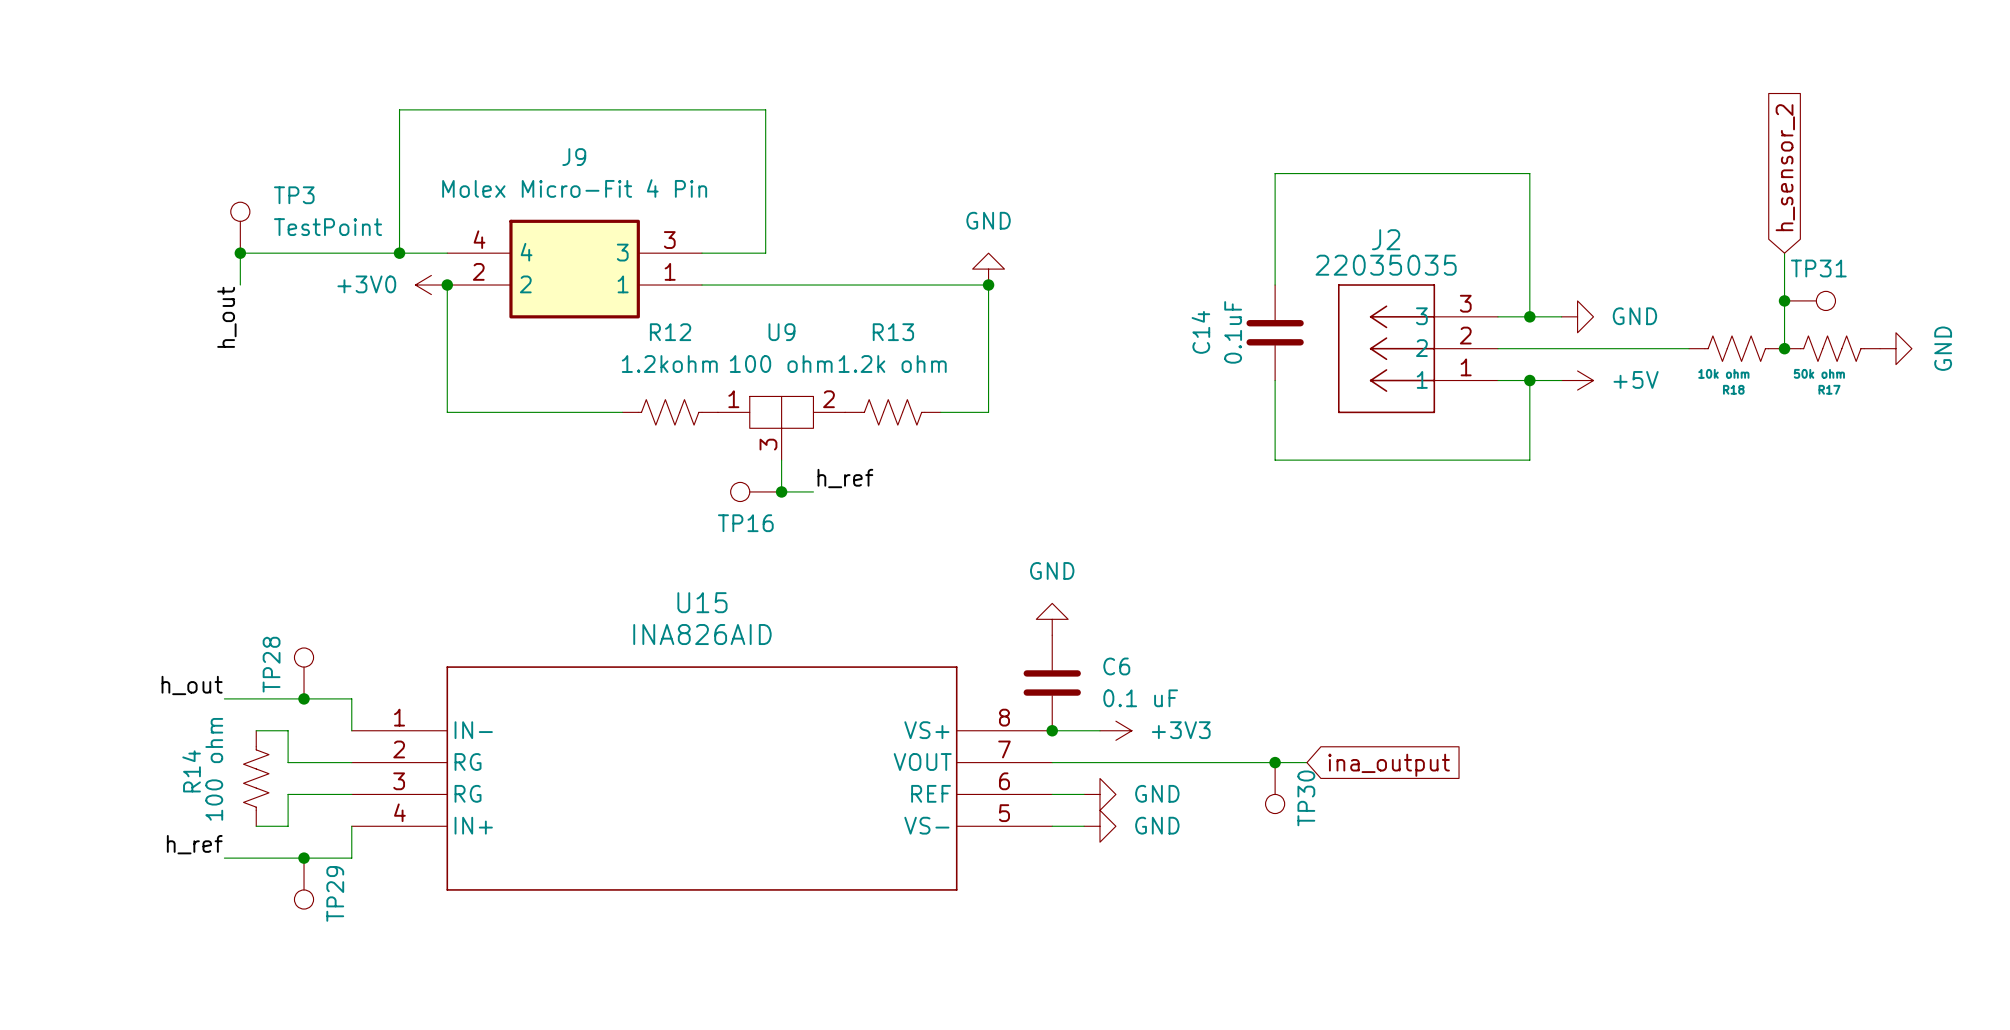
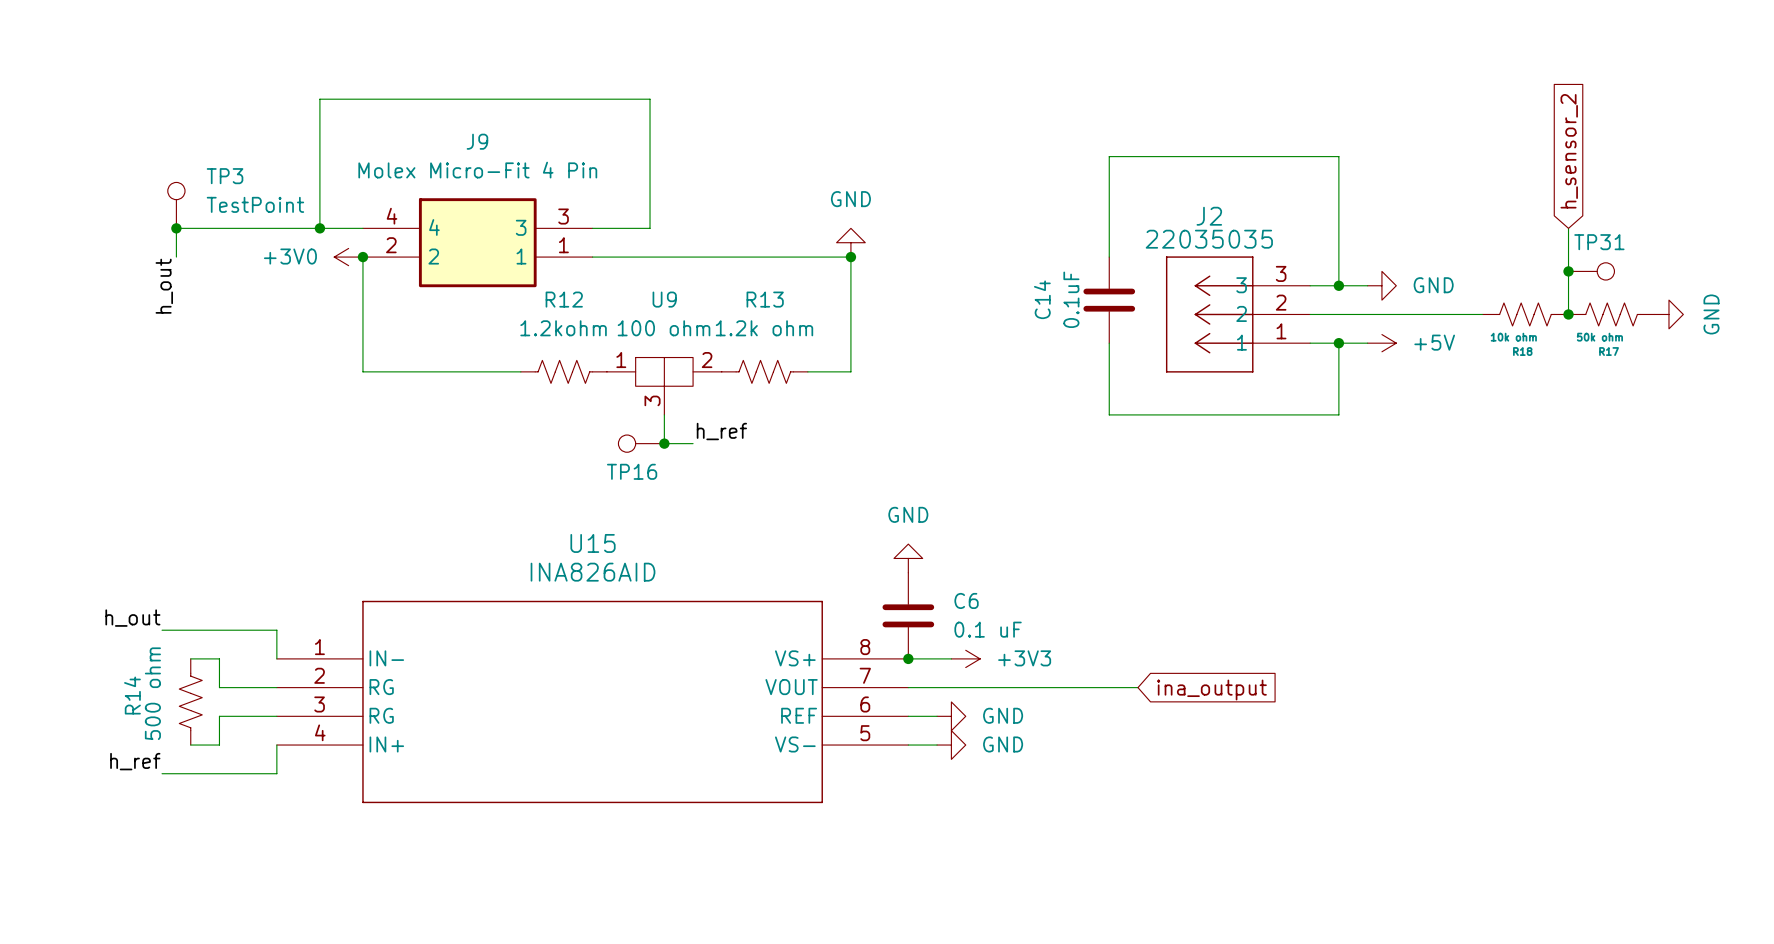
TP28: (304, 673) -> none
junction: (304, 698) -> none
junction: (1275, 762) -> none
R14 value: 100 ohm (214, 769) -> 500 ohm (152, 693)
TP30: (1275, 788) -> none
junction: (304, 858) -> none
TP29: (304, 883) -> none

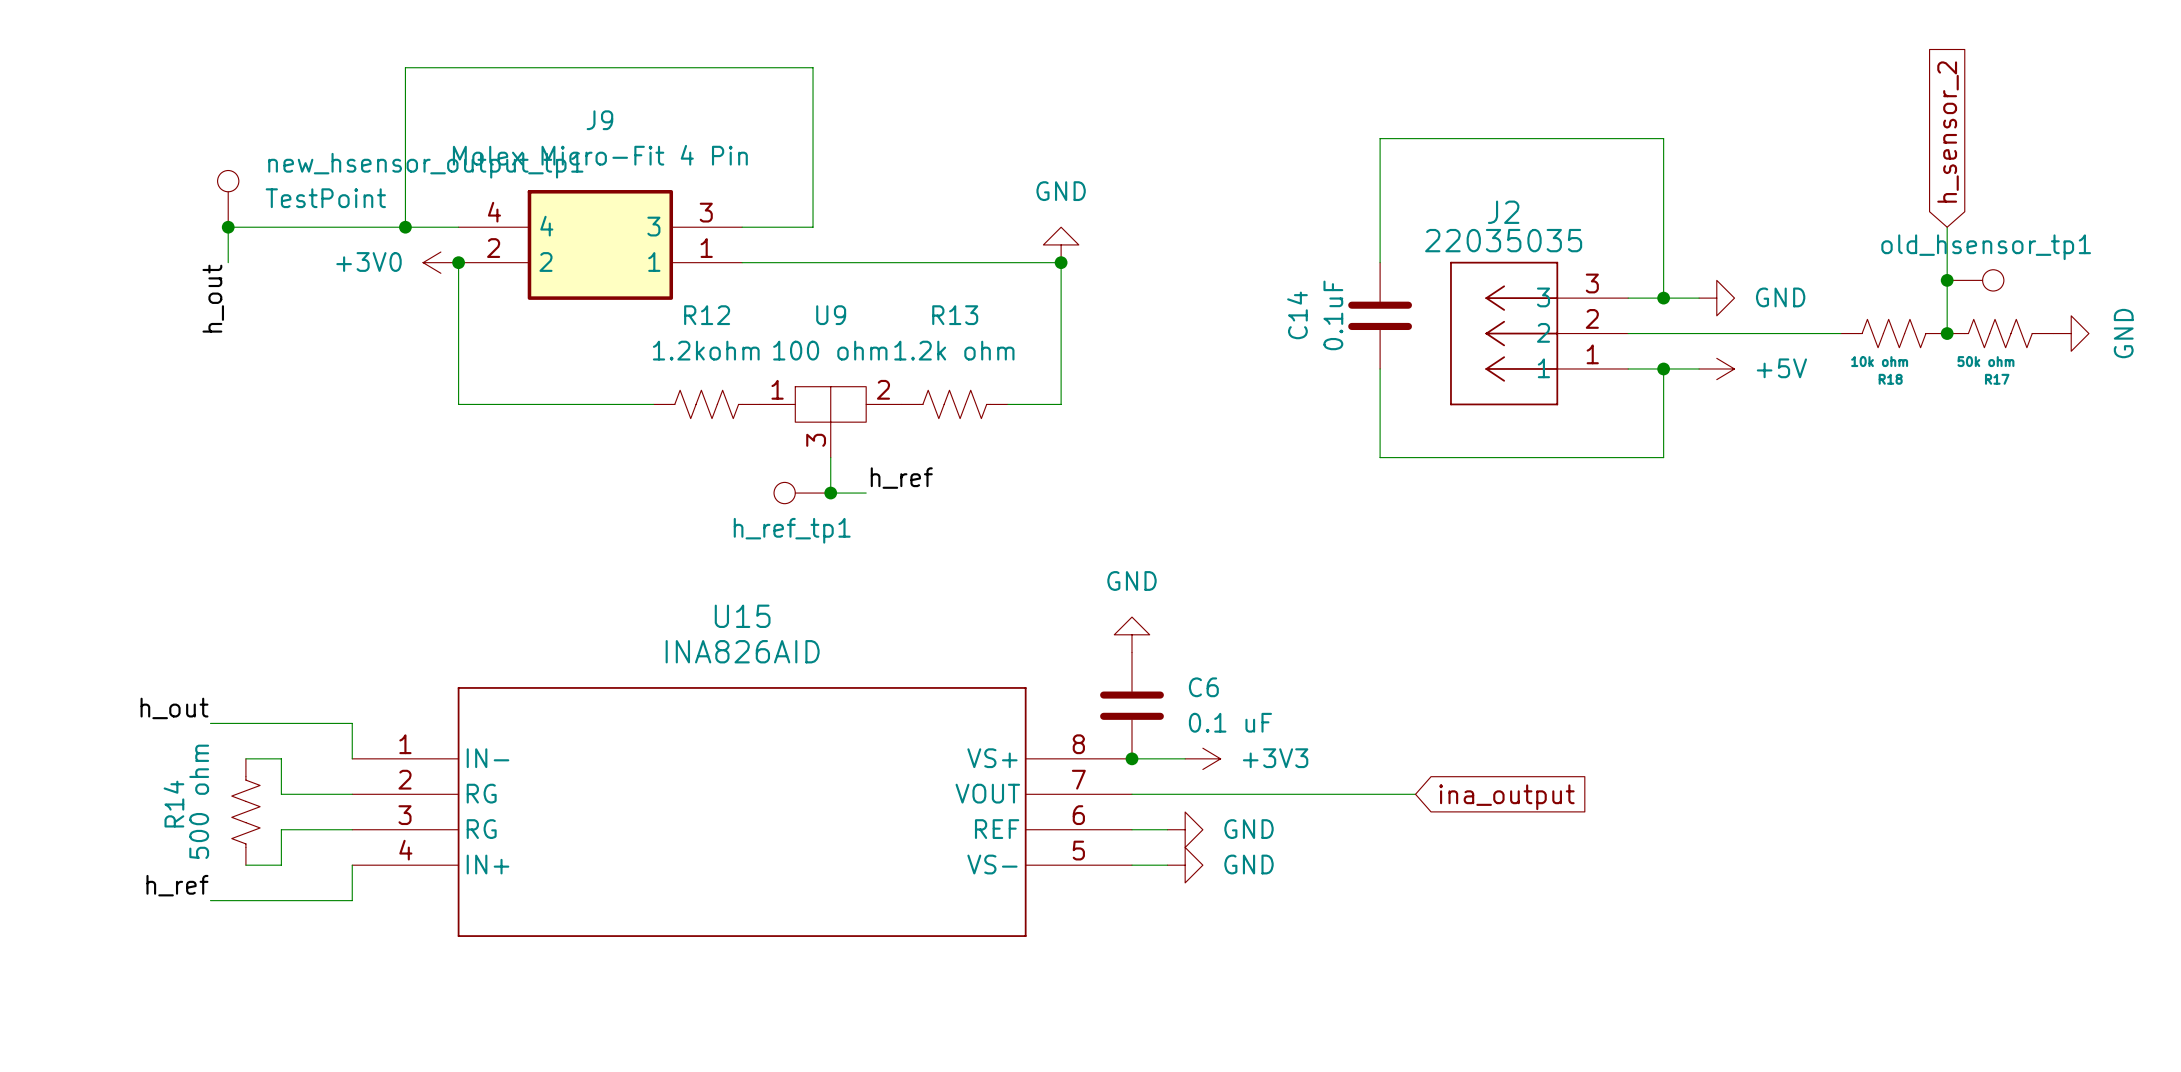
TP3 name: TP3 (225, 176) -> new_hsensor_output_tp1 (425, 165)
TP31 name: TP31 (1599, 242) -> old_hsensor_tp1 (1986, 247)
TP16 name: TP16 (632, 471) -> h_ref_tp1 (792, 530)

